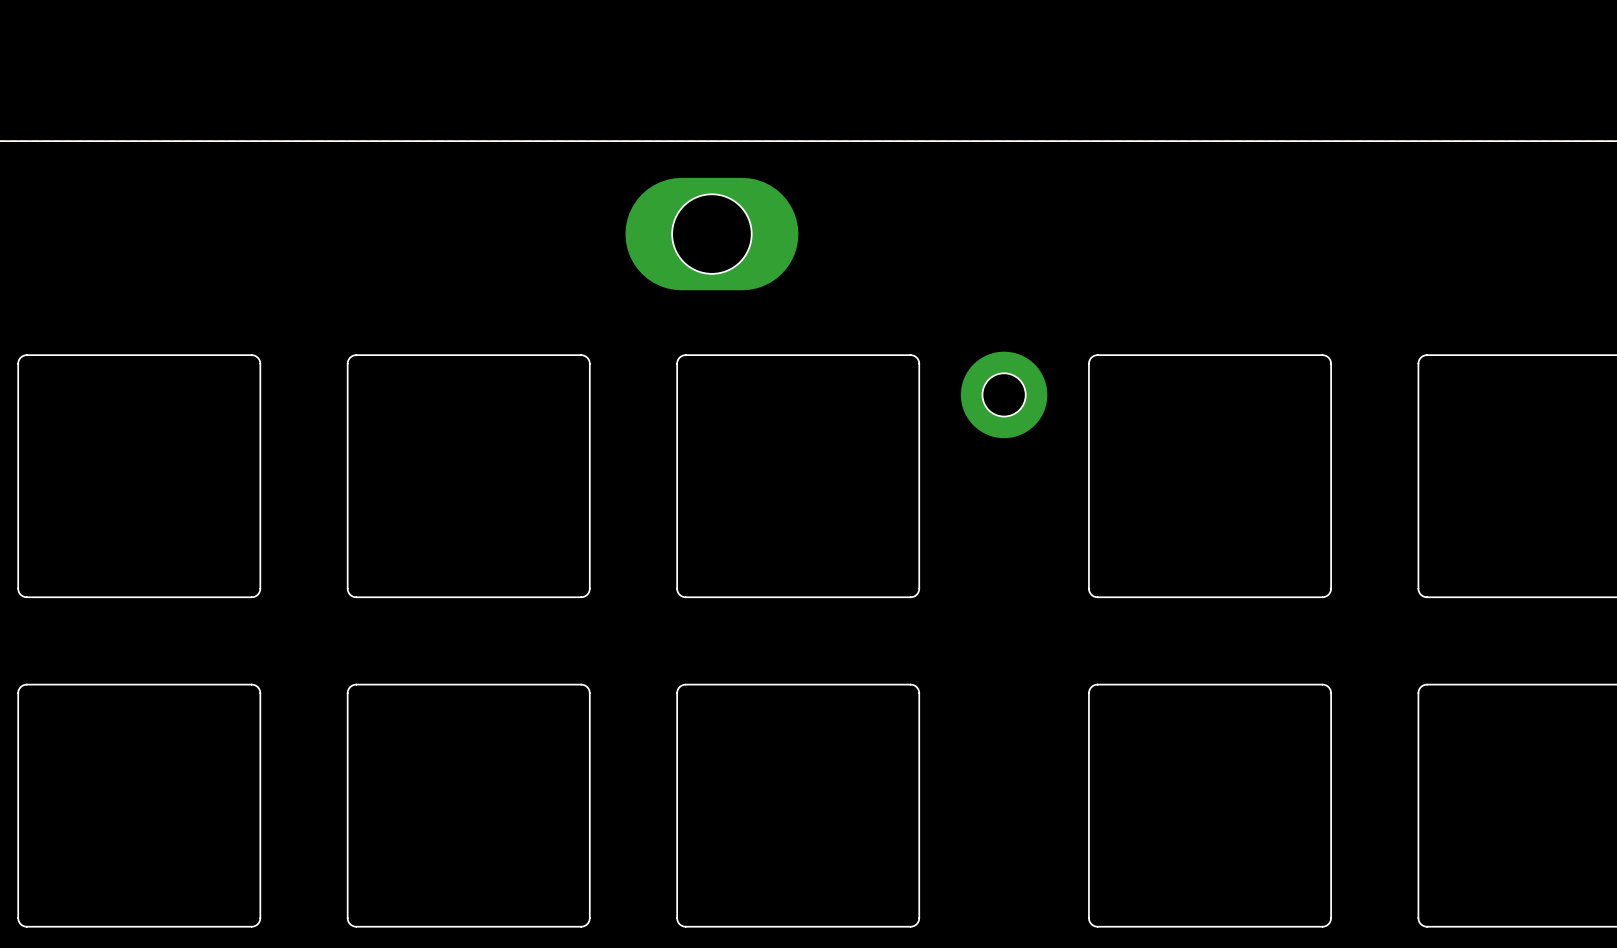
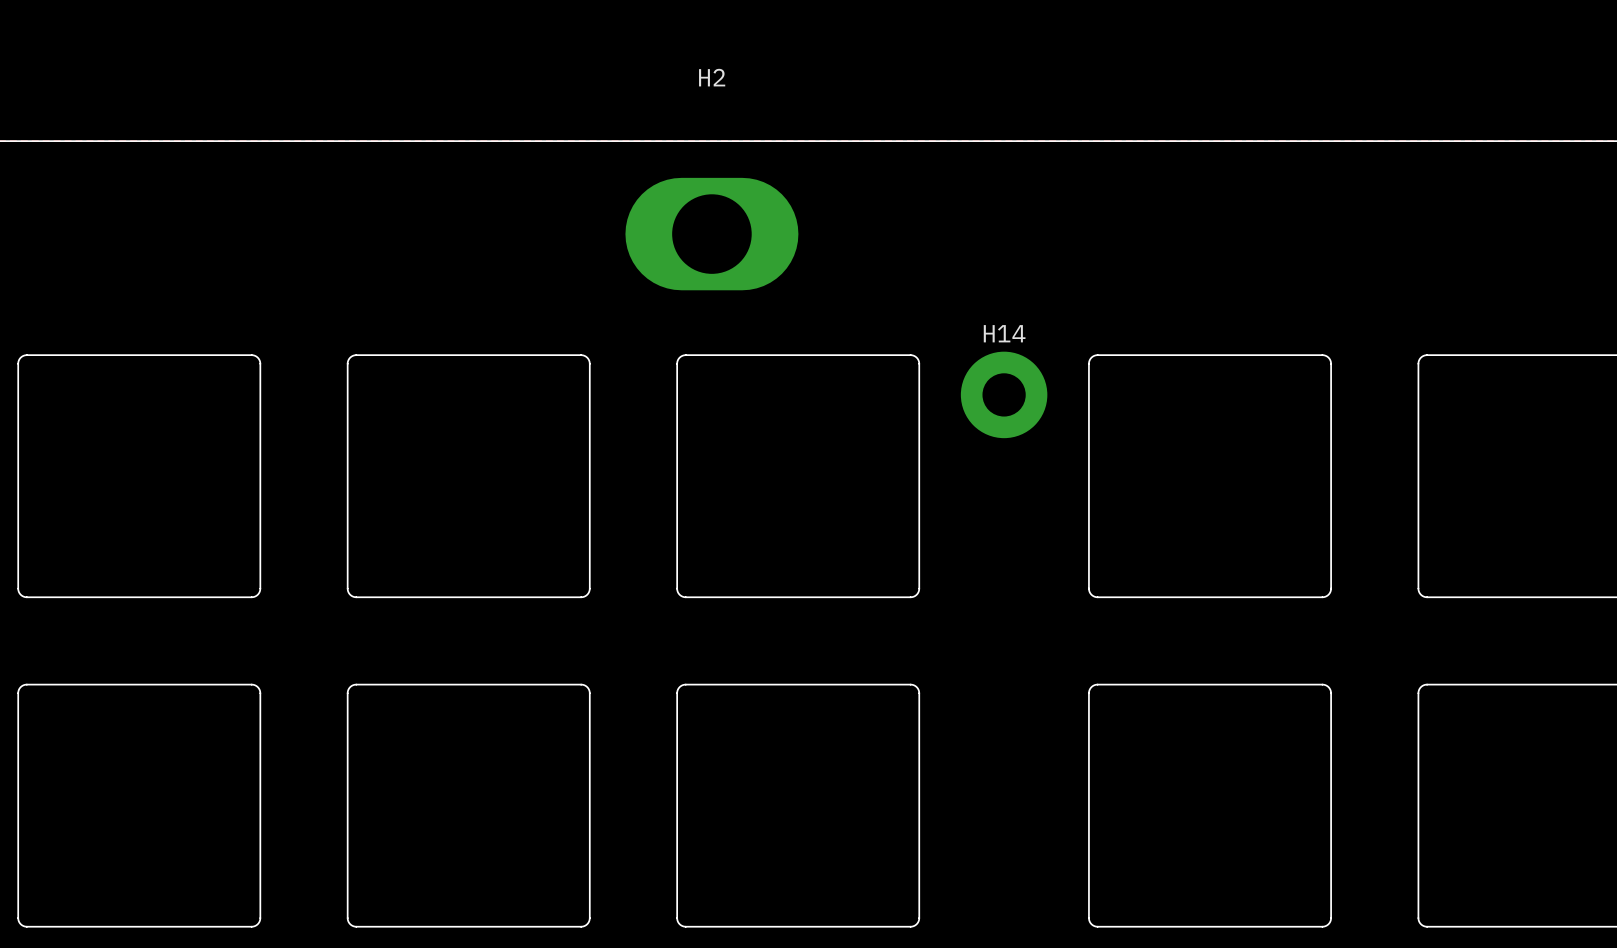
H2 name: none -> H2 (712, 77)
round board edge: [671, 193, 753, 275] -> none
H14 name: none -> H14 (1004, 333)
round board edge: [981, 372, 1027, 418] -> none

